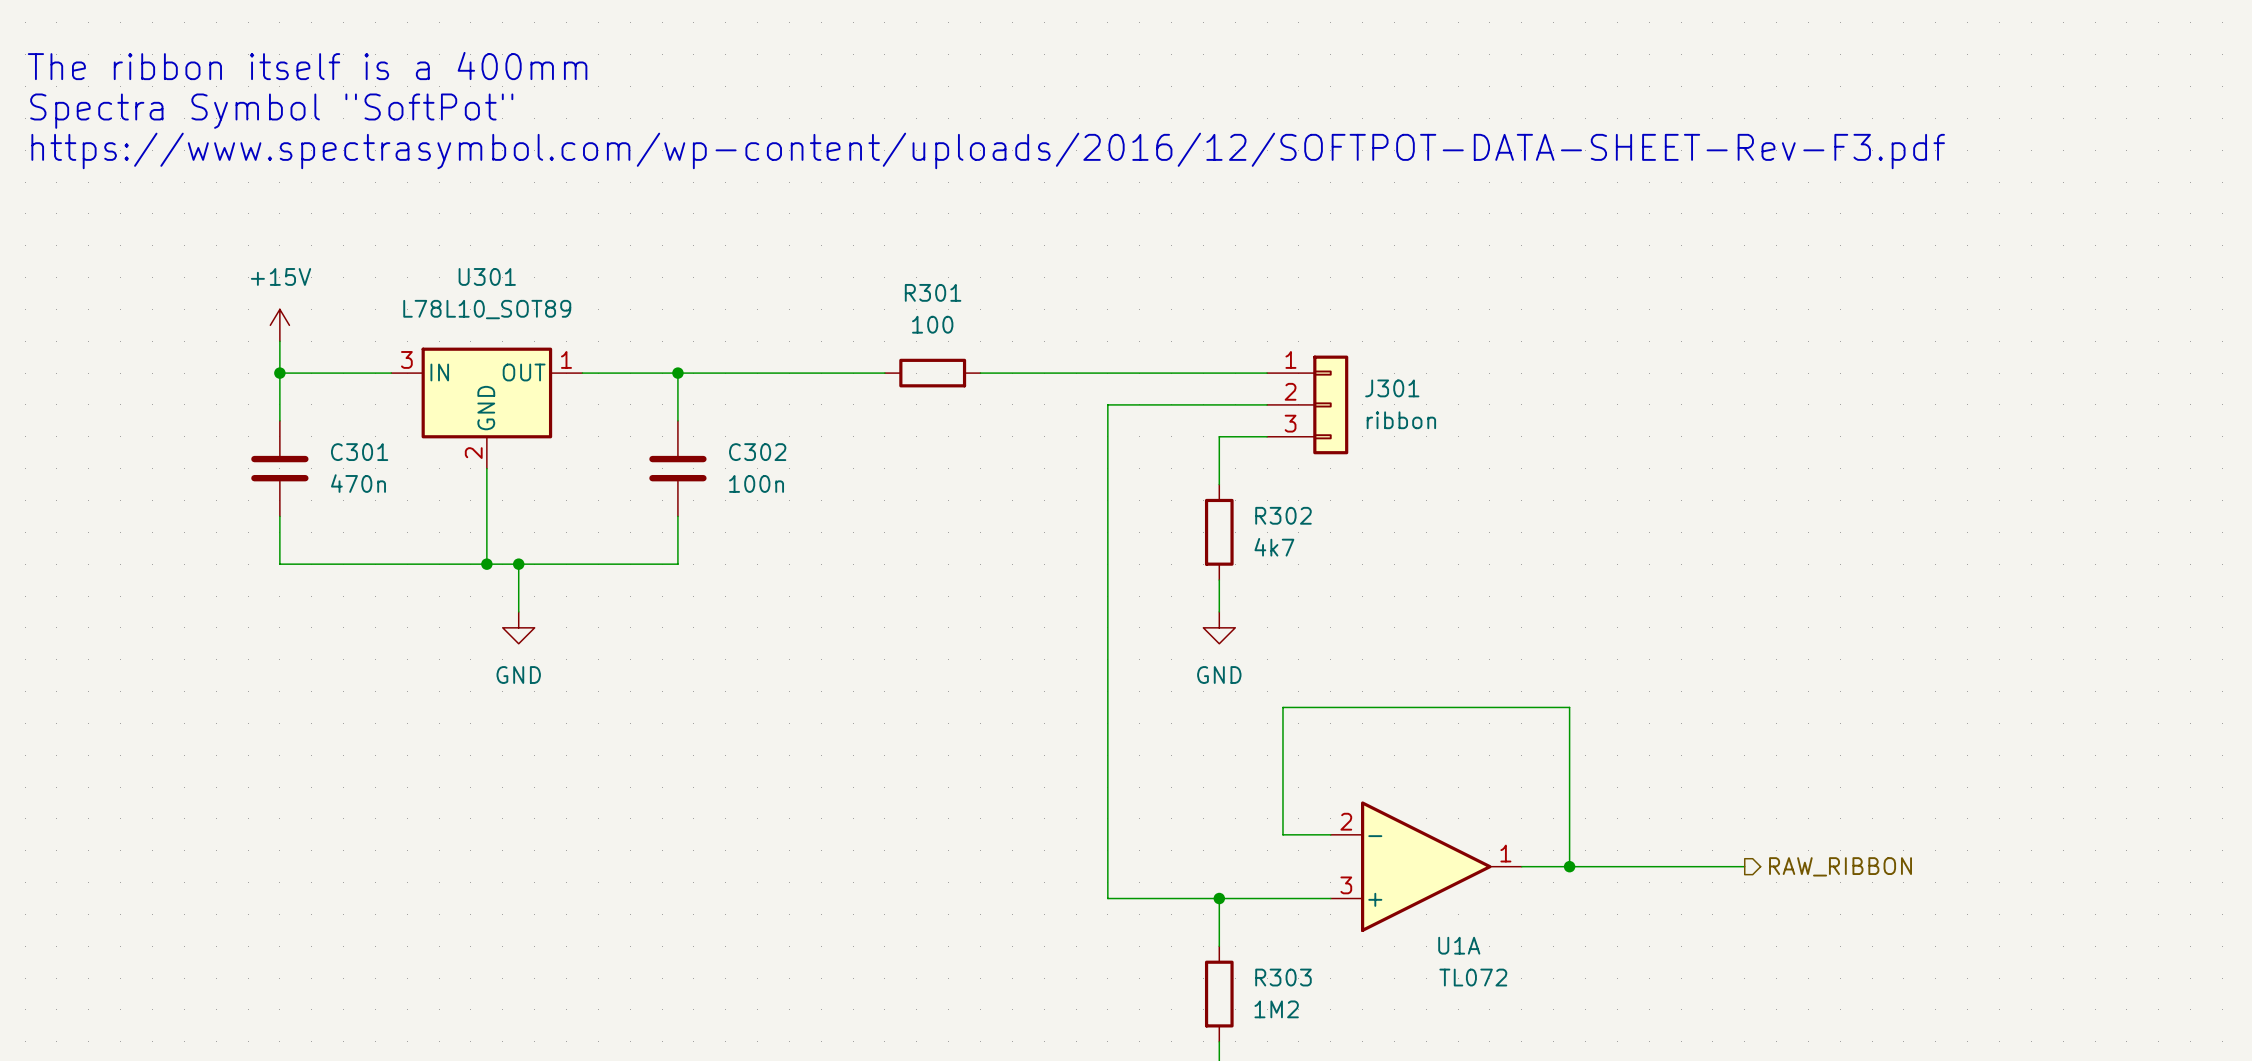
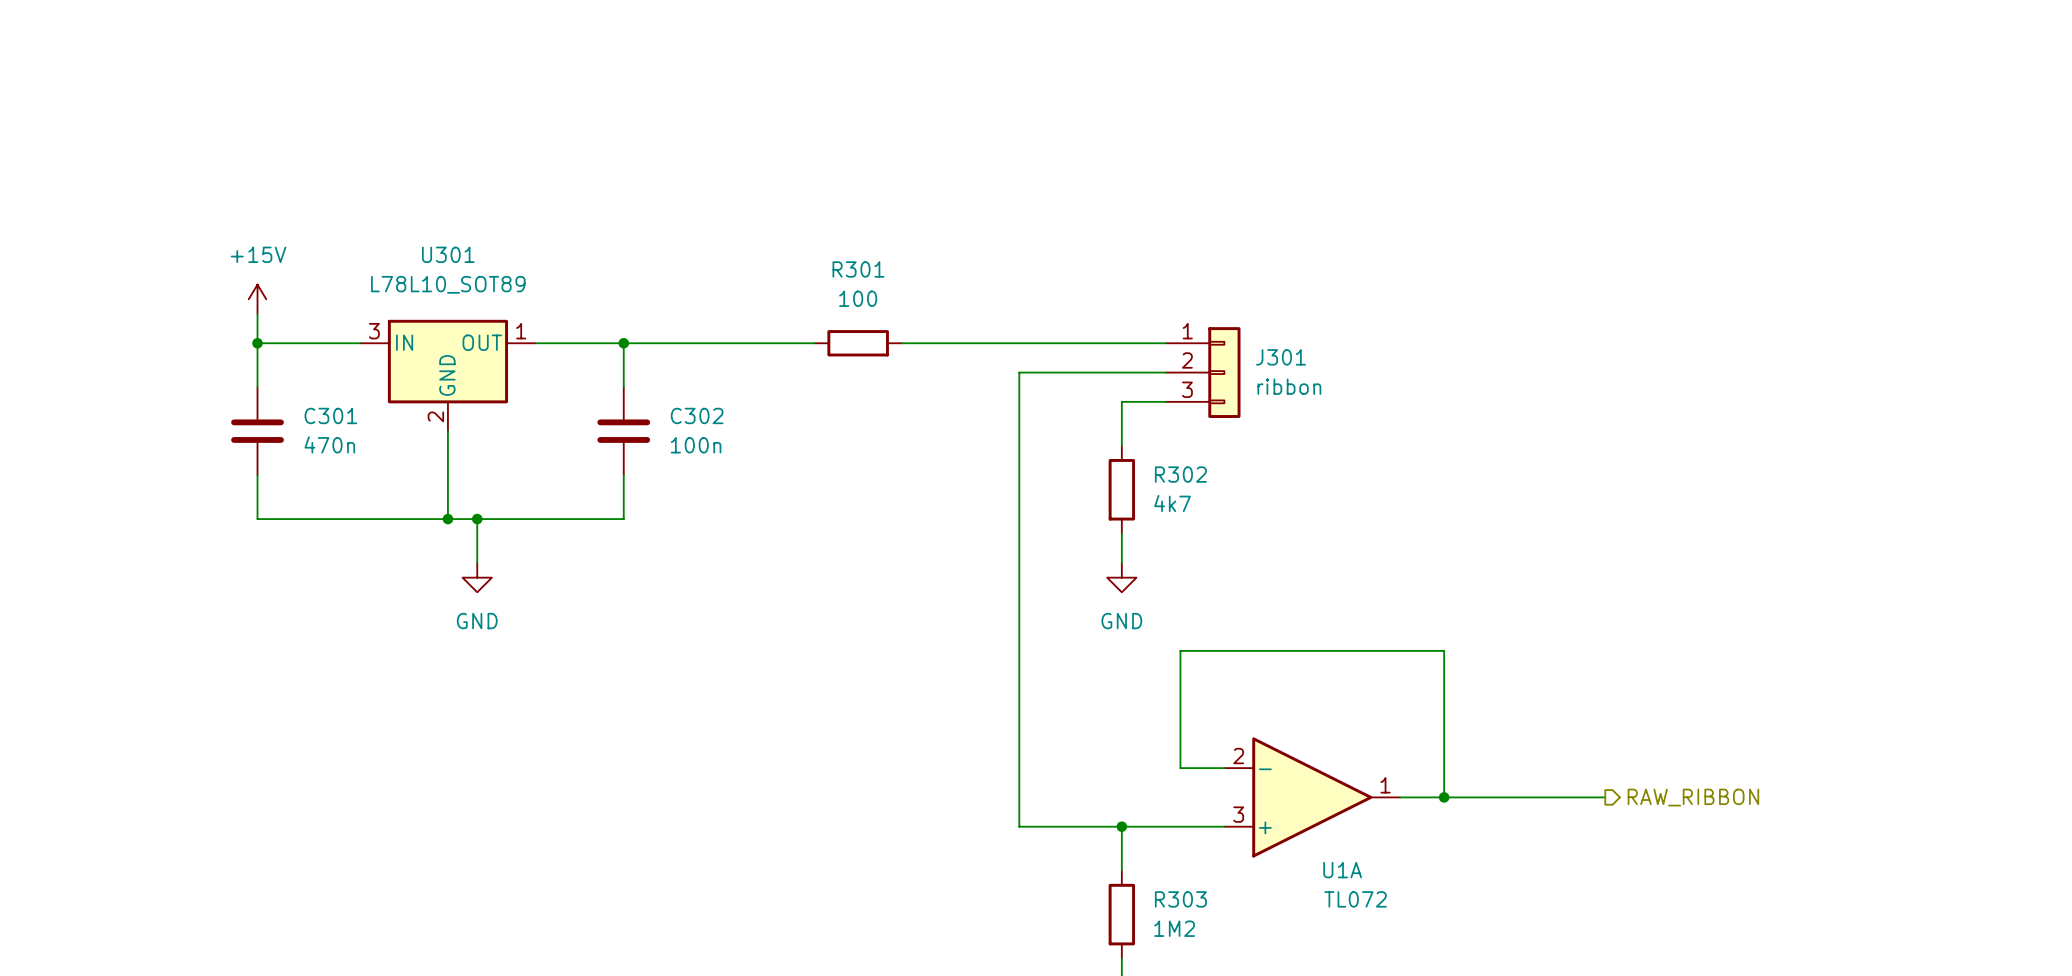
text: The ribbon itself is a 400mm (307, 66) -> none
text: Spectra Symbol "SoftPot" (271, 111) -> none
text: https://www.spectrasymbol.com/wp-content/uploads/2016/12/SOFTPOT-DATA-SHEET-Rev-F3.pdf (988, 150) -> none

